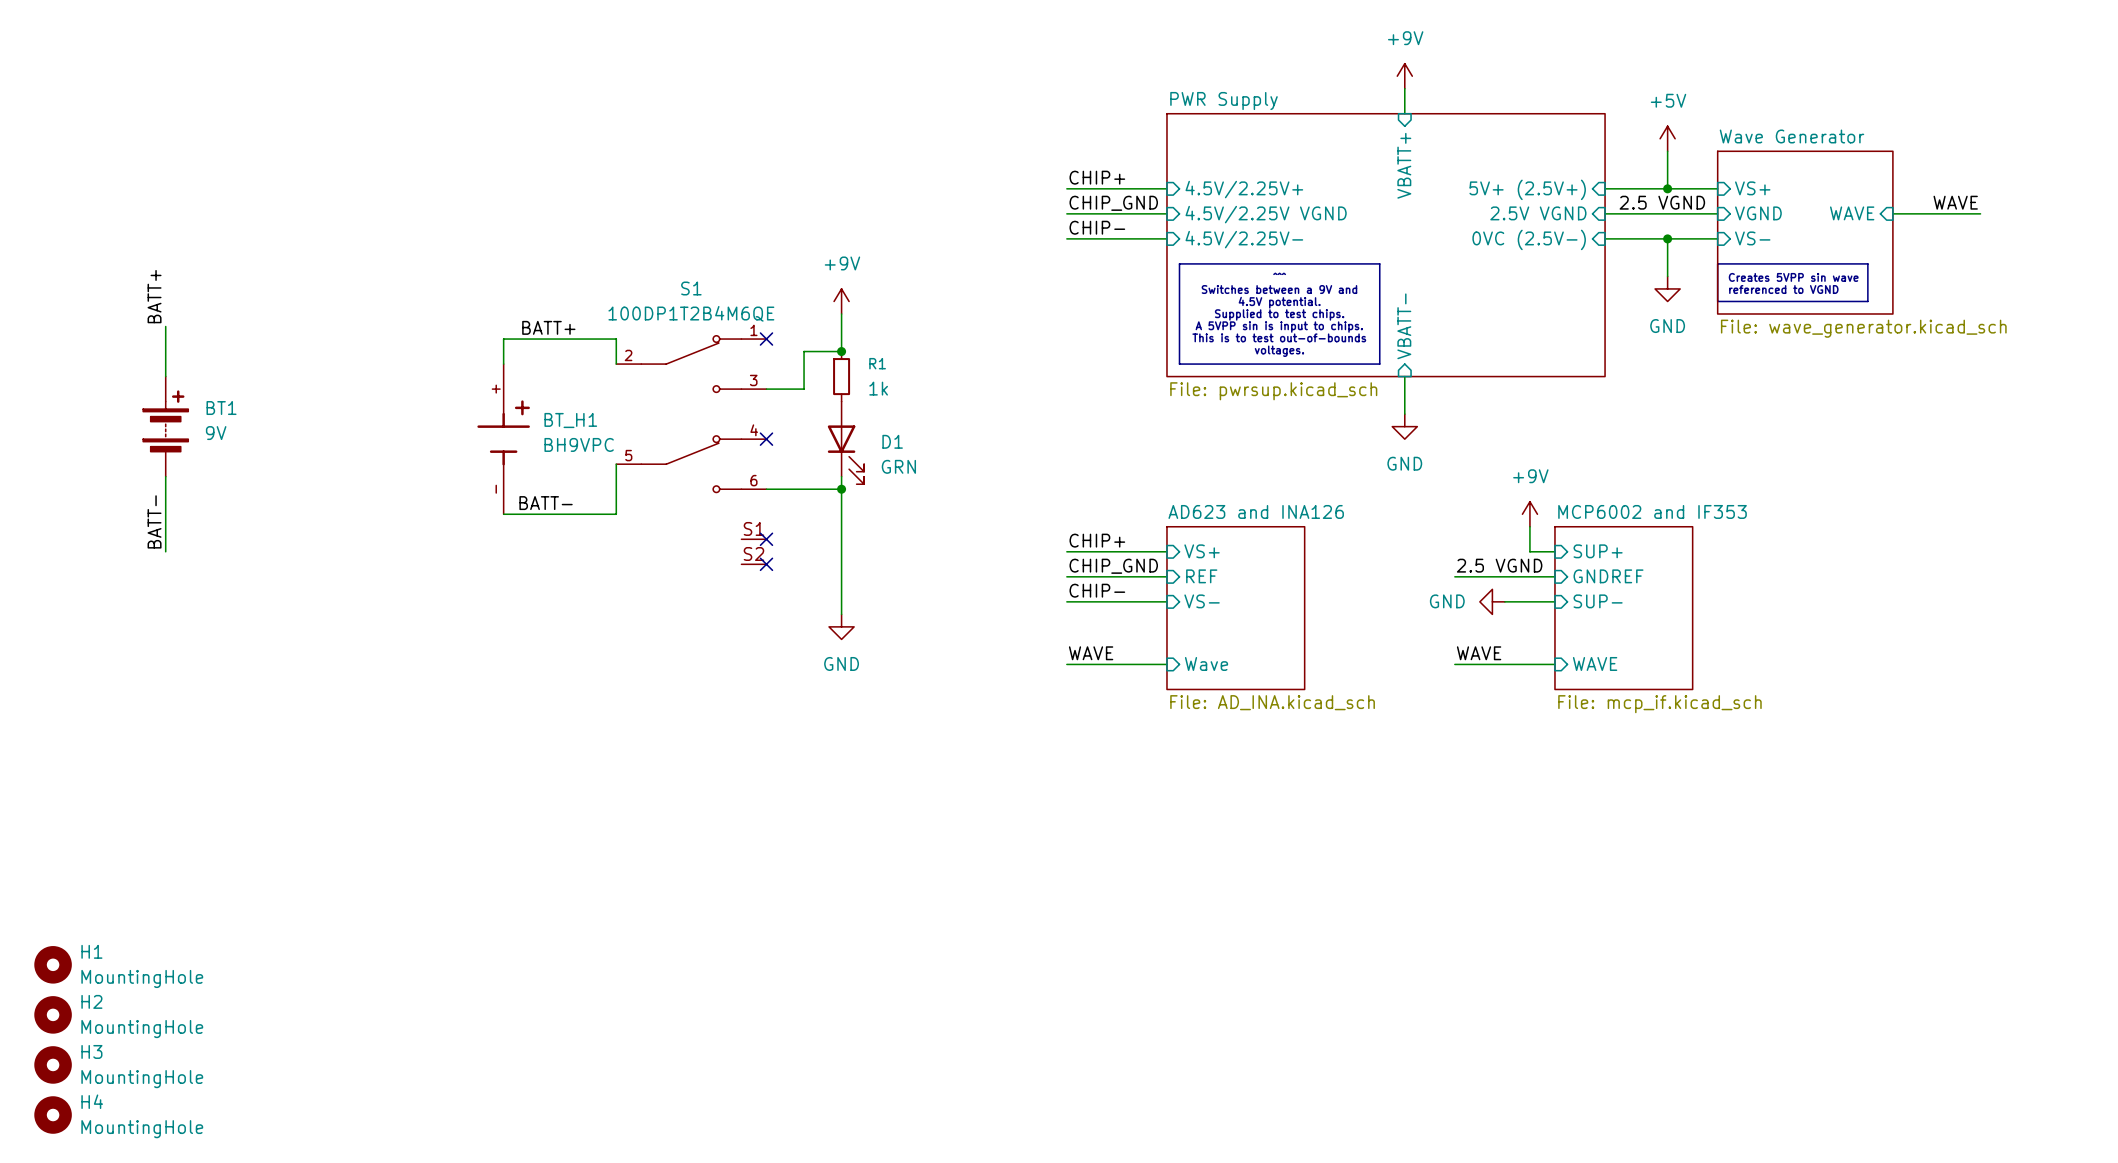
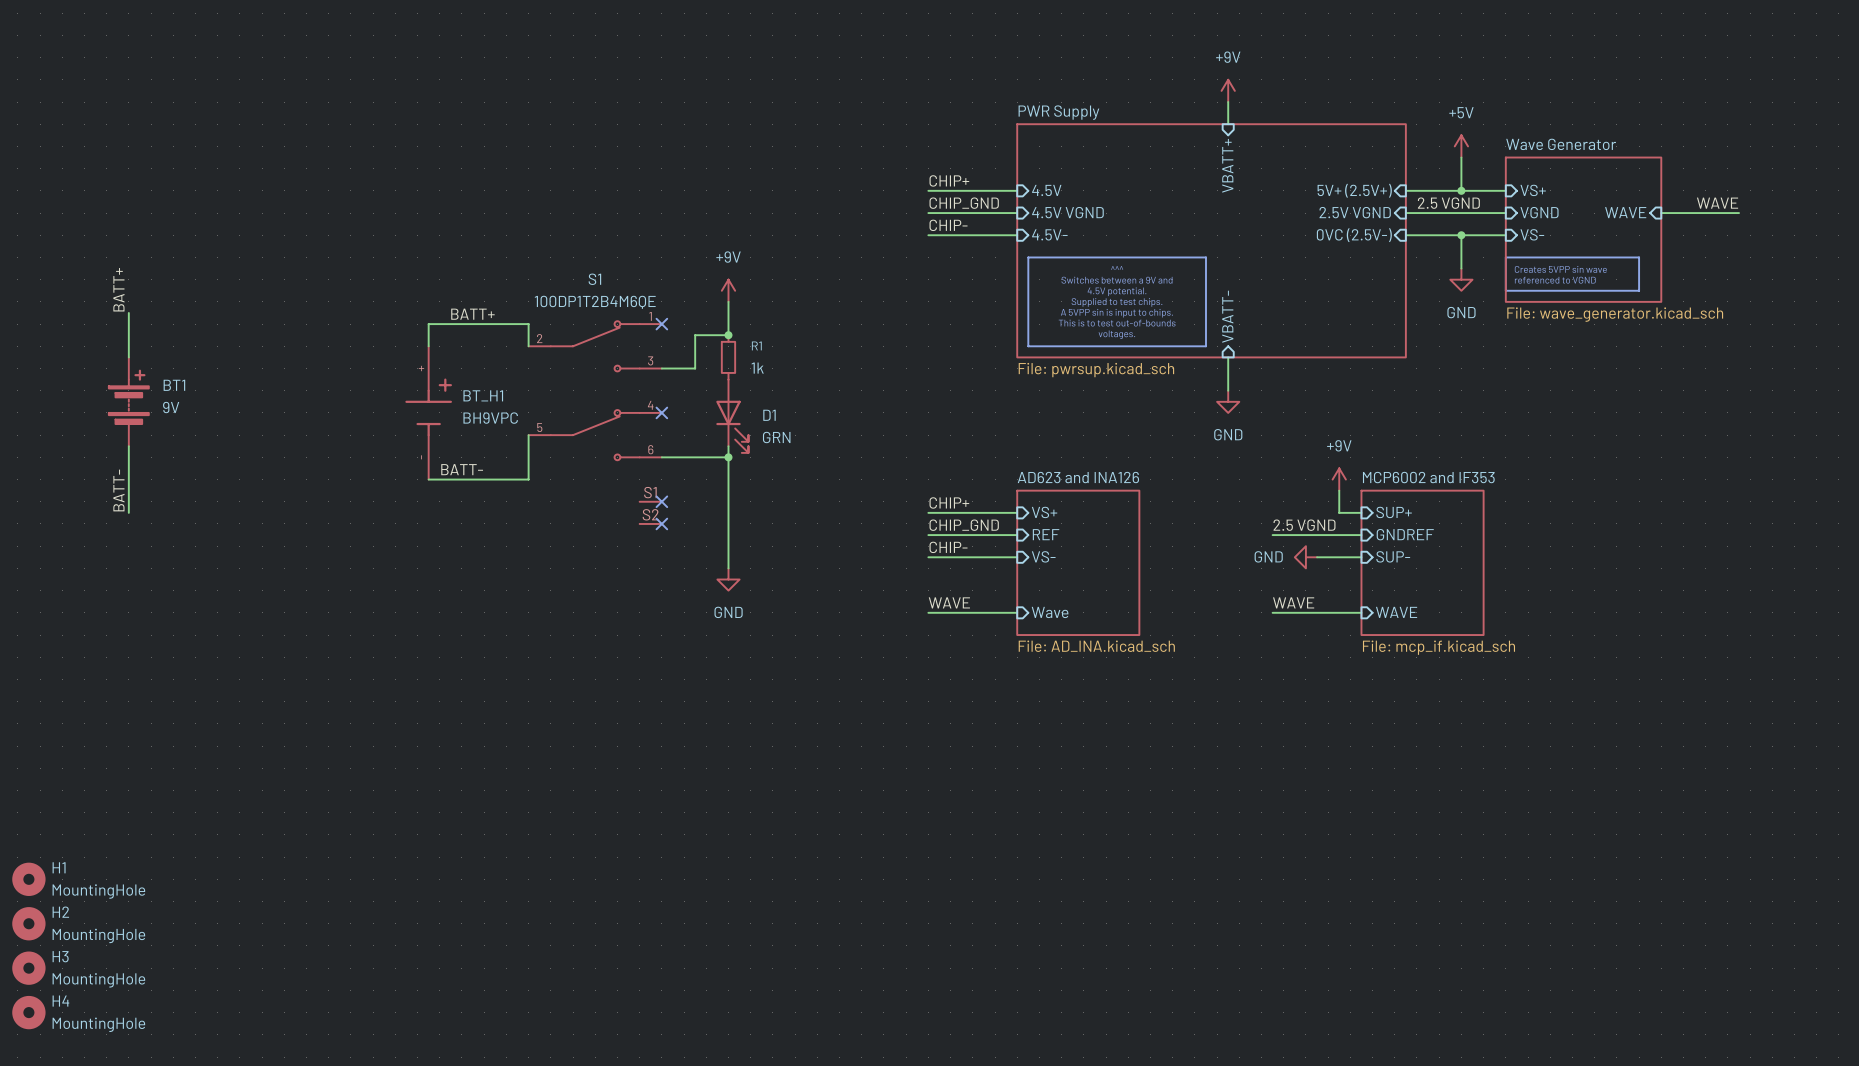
sheet pin: 4.5V/2.25V+ (1244, 189) -> 4.5V (1046, 190)
sheet pin: 4.5V/2.25V VGND (1266, 214) -> 4.5V VGND (1067, 212)
sheet pin: 4.5V/2.25V- (1244, 239) -> 4.5V- (1049, 234)

